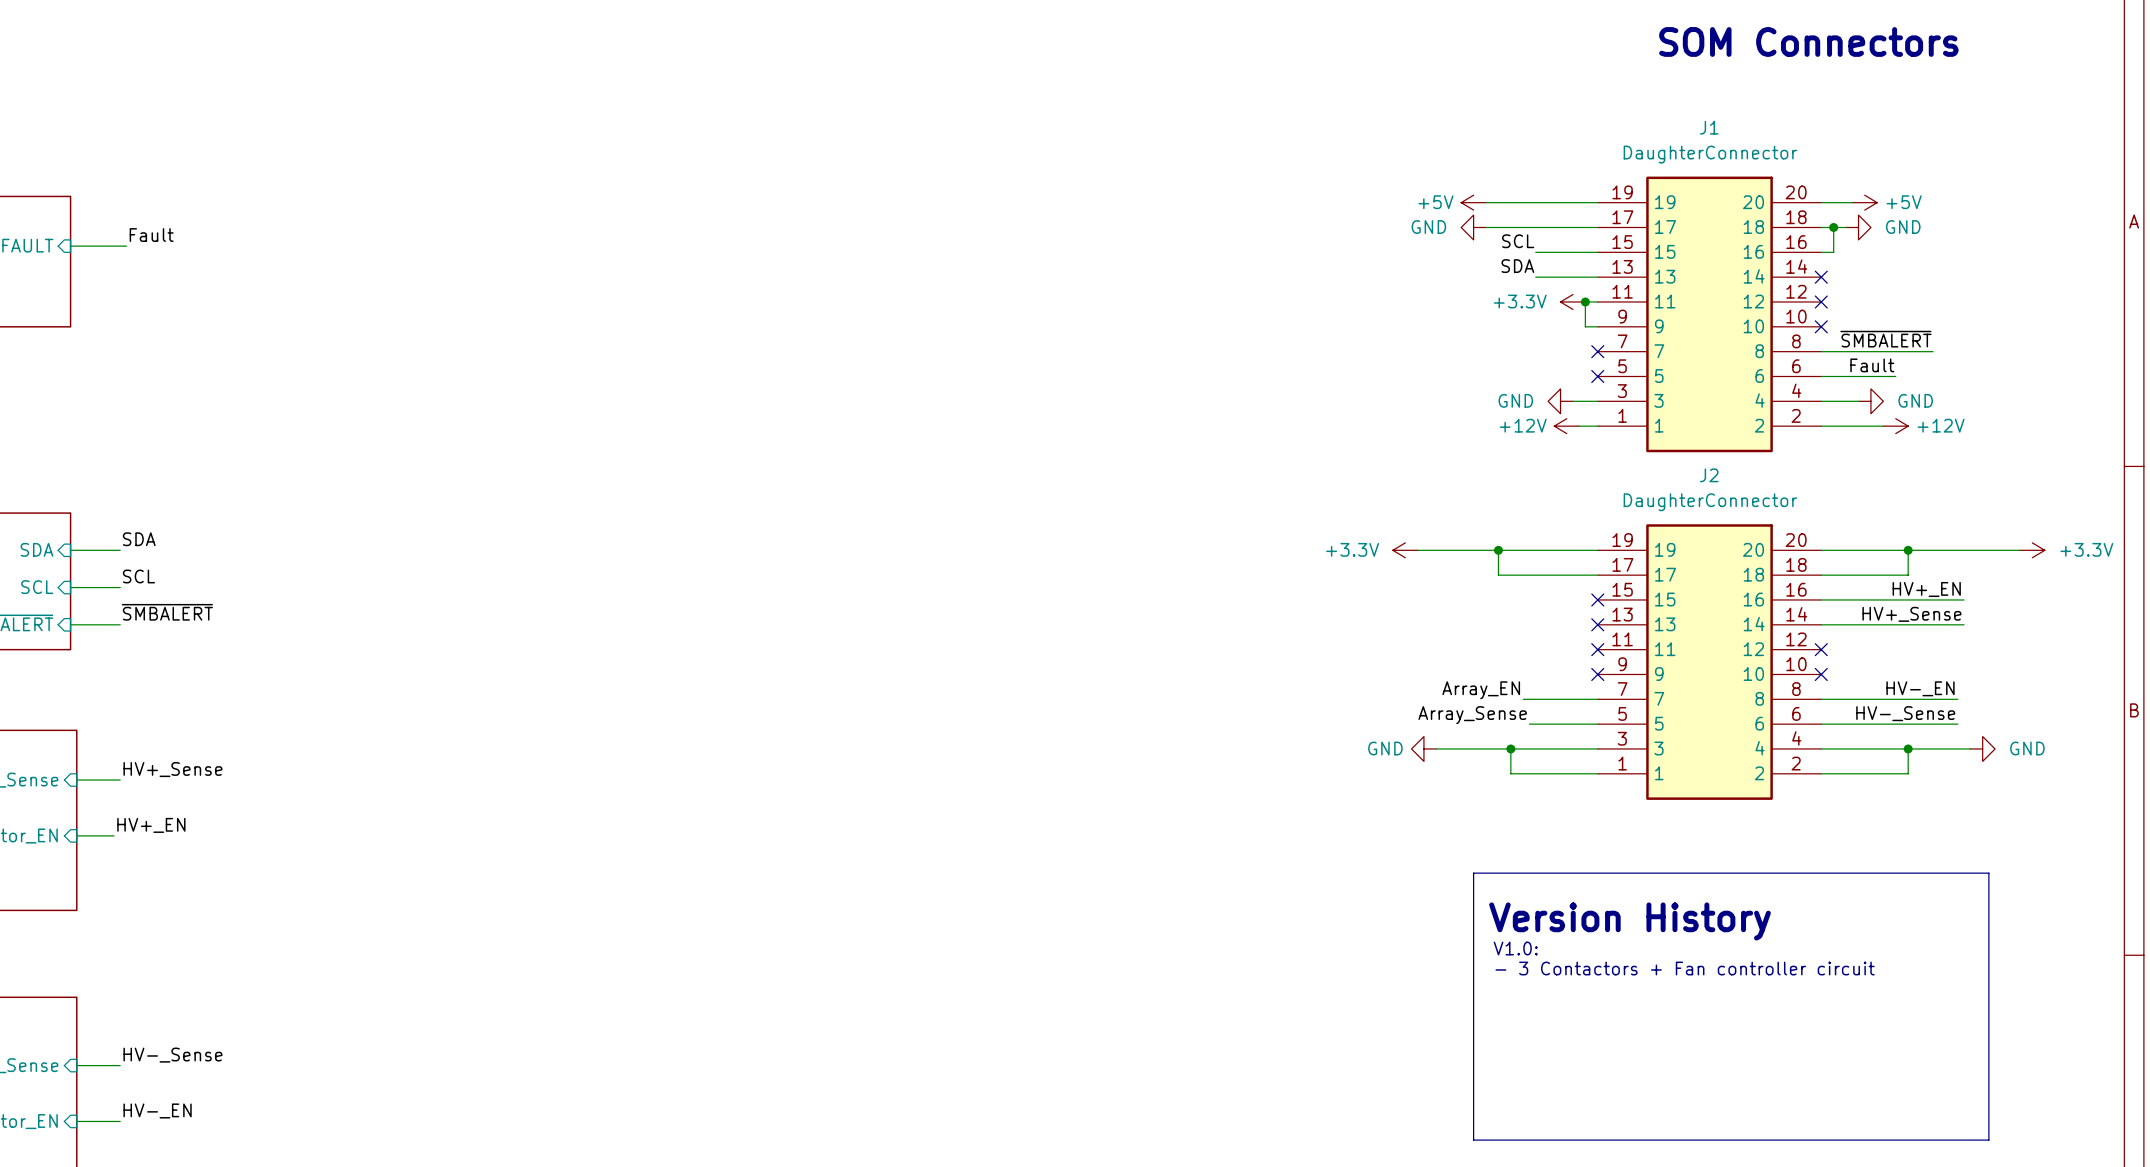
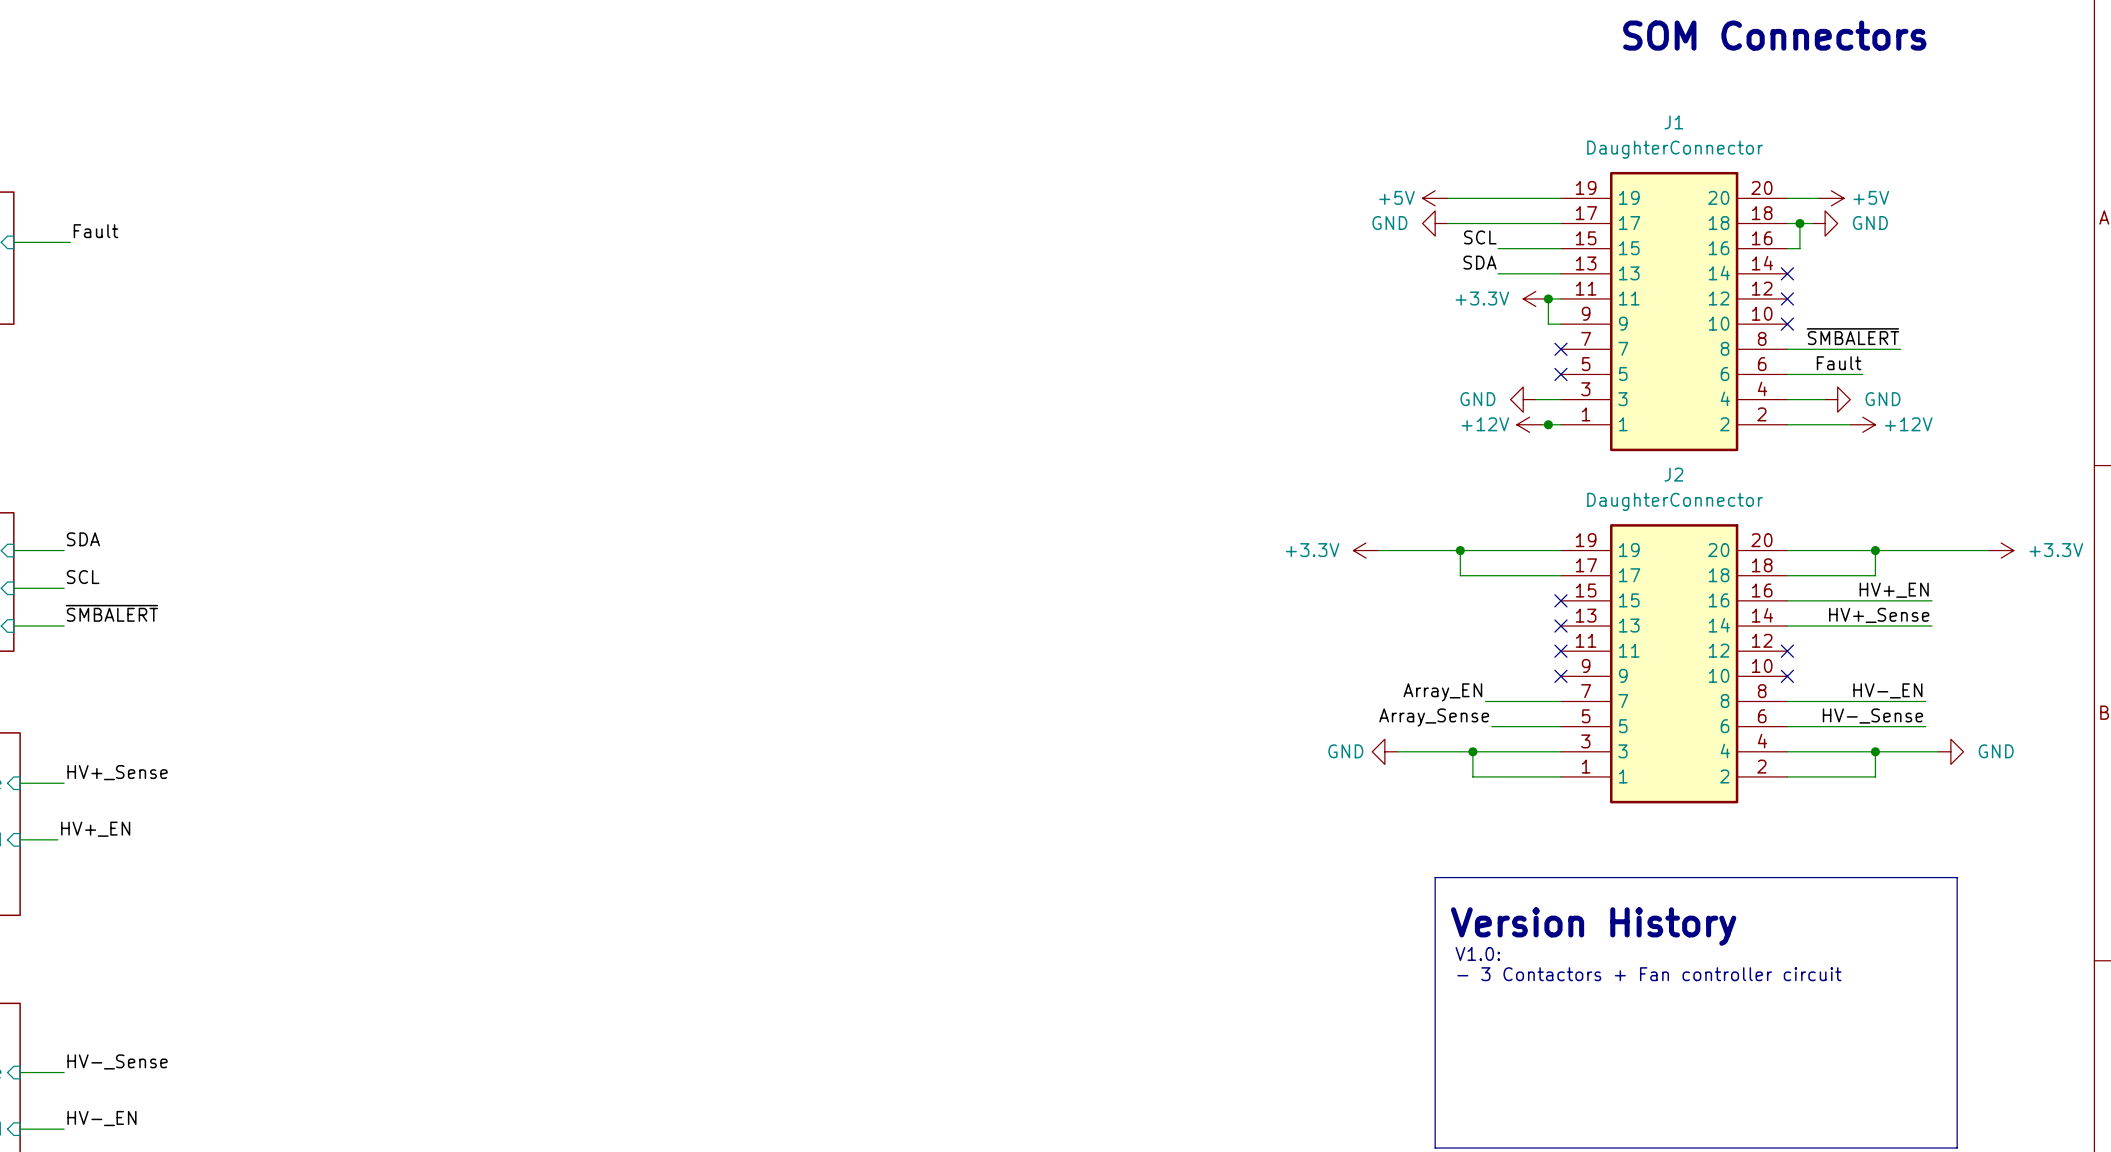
junction: none -> (1548, 424)

